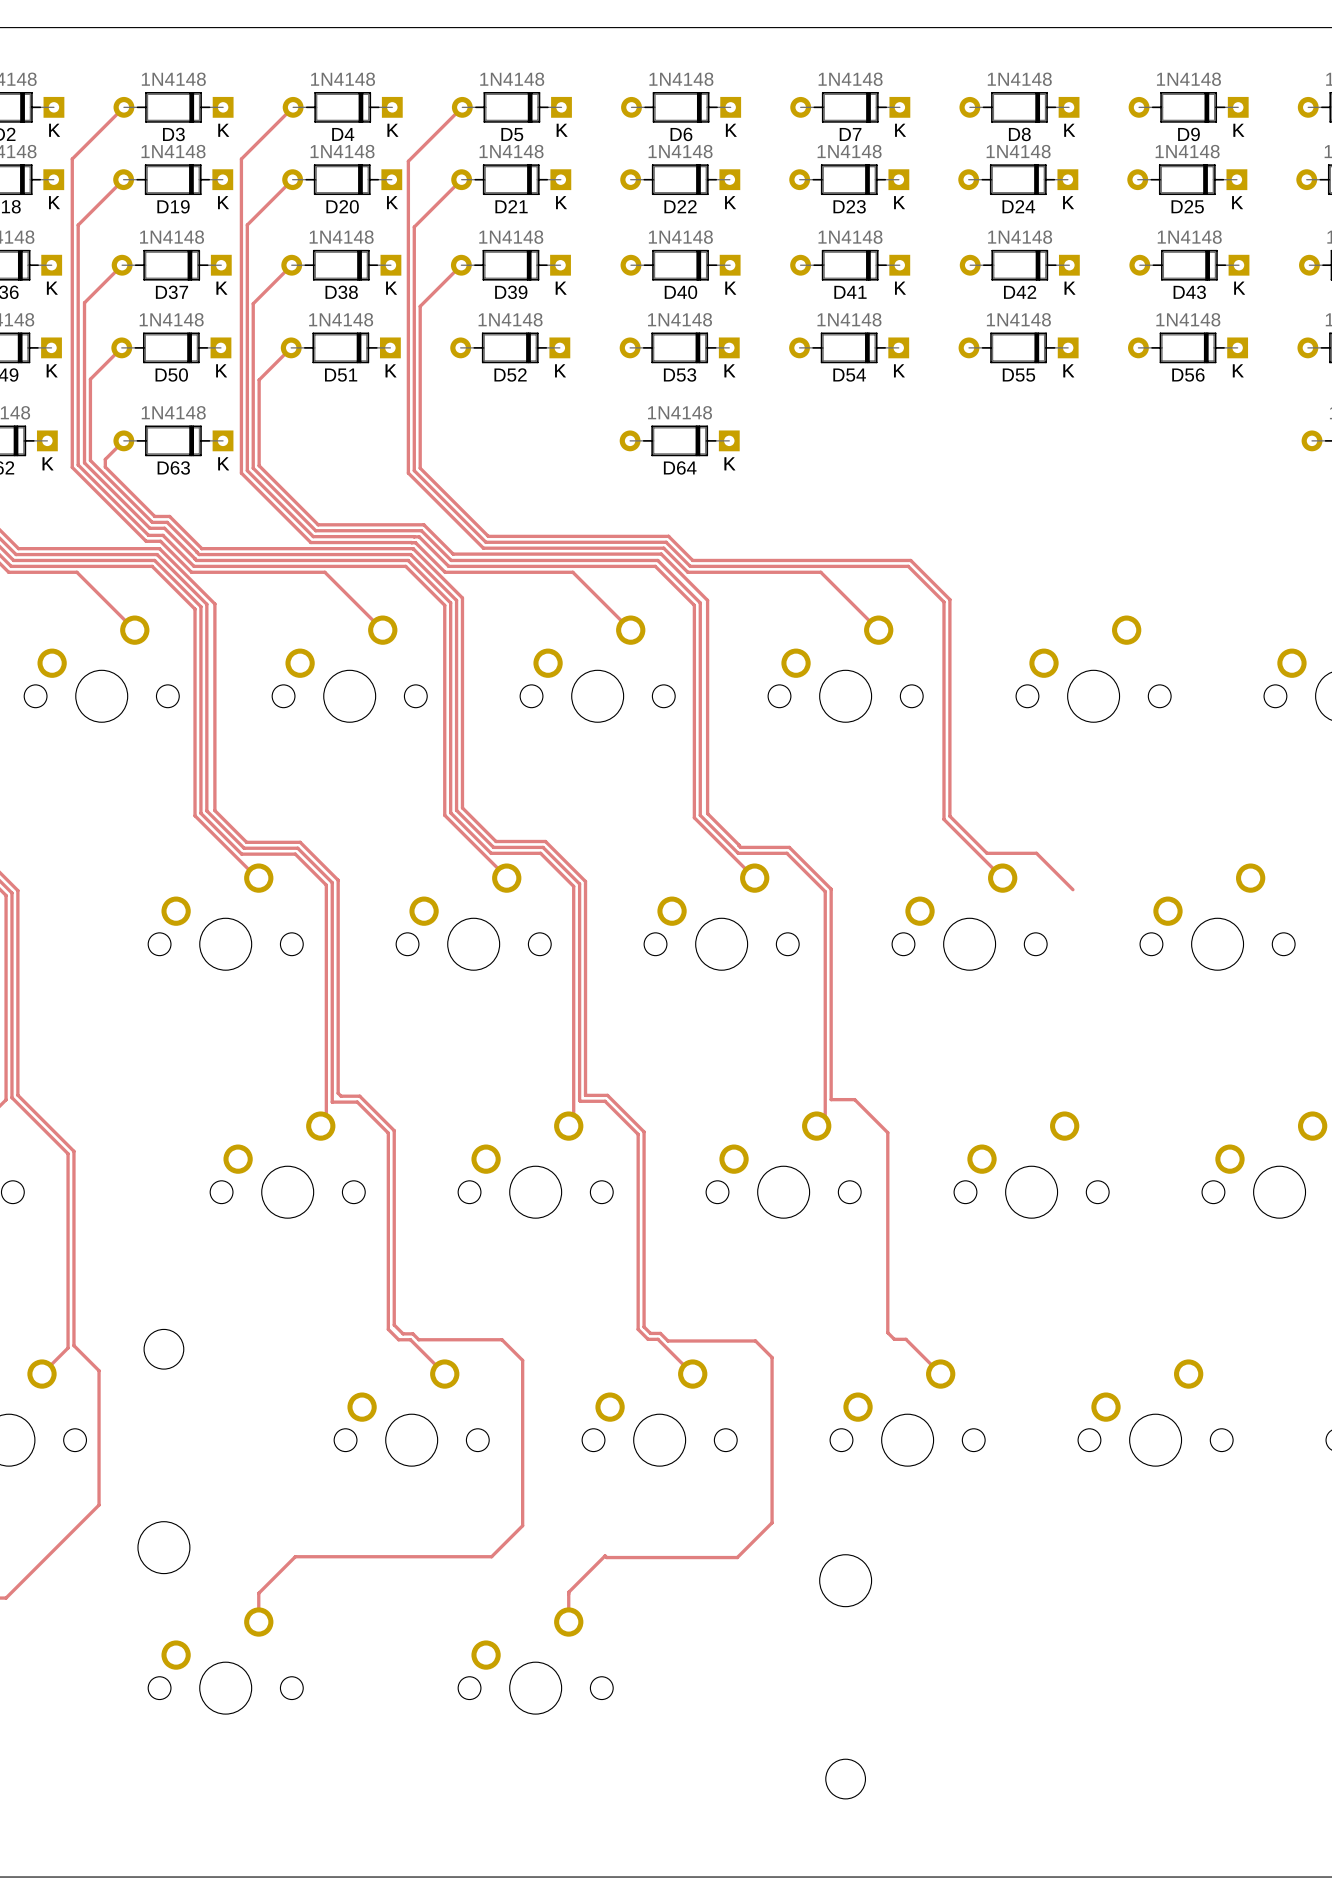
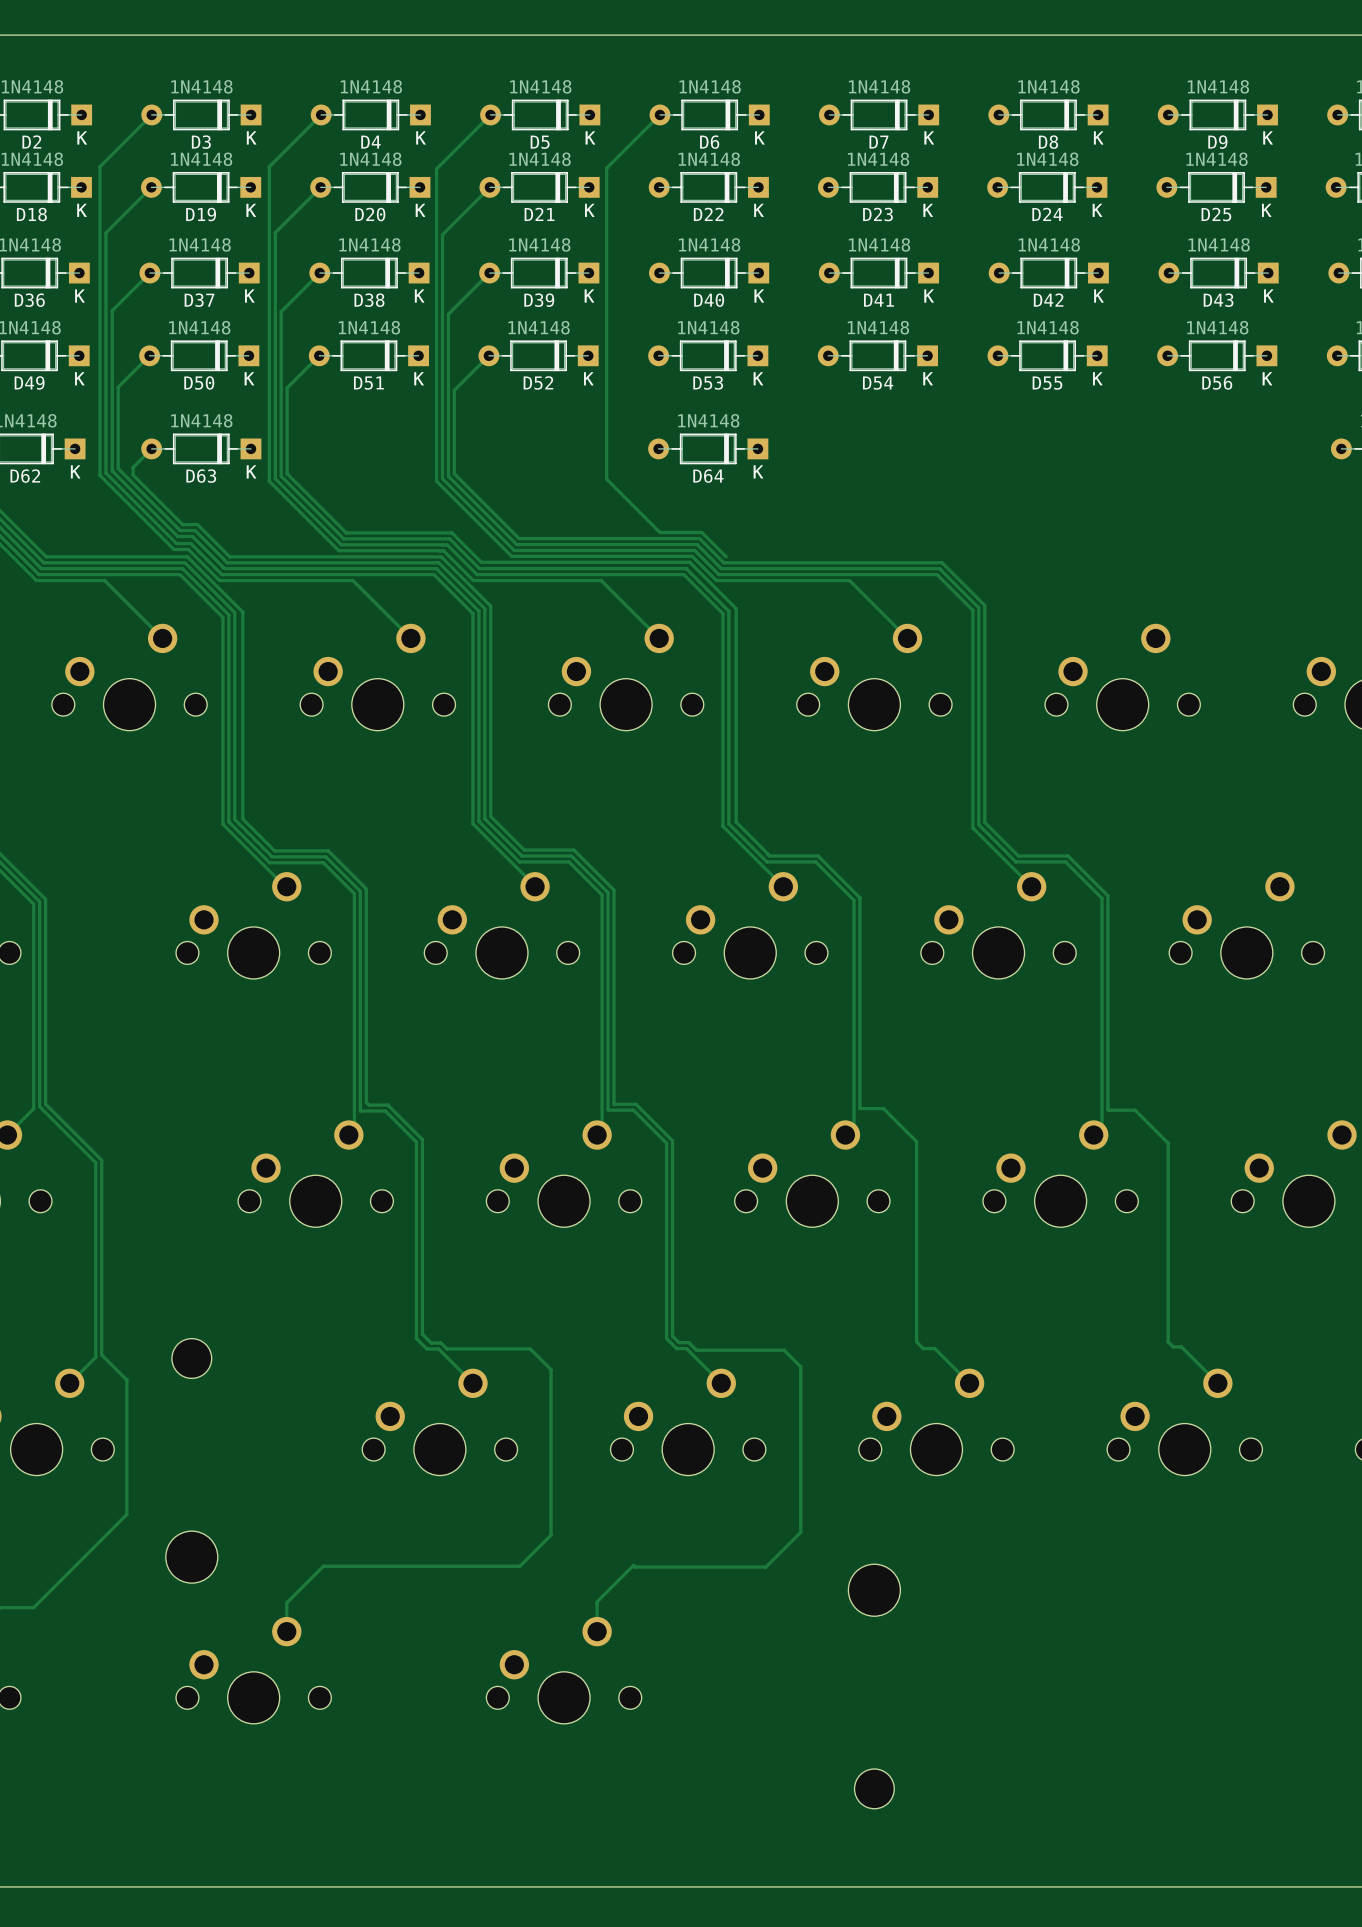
track: none -> (659, 114) (606, 168) (606, 479) (660, 532) (701, 532) (726, 556)
track: none -> (488, 355) (454, 390) (454, 473) (519, 538) (699, 538) (723, 562) (942, 562) (984, 605) (984, 822) (1018, 855) (1068, 855) (1107, 895) (1107, 1109) (1135, 1110) (1168, 1143) (1168, 1341) (1173, 1346) (1181, 1346) (1217, 1383)
track: none -> (1102, 898) (1102, 1126) (1093, 1135)

